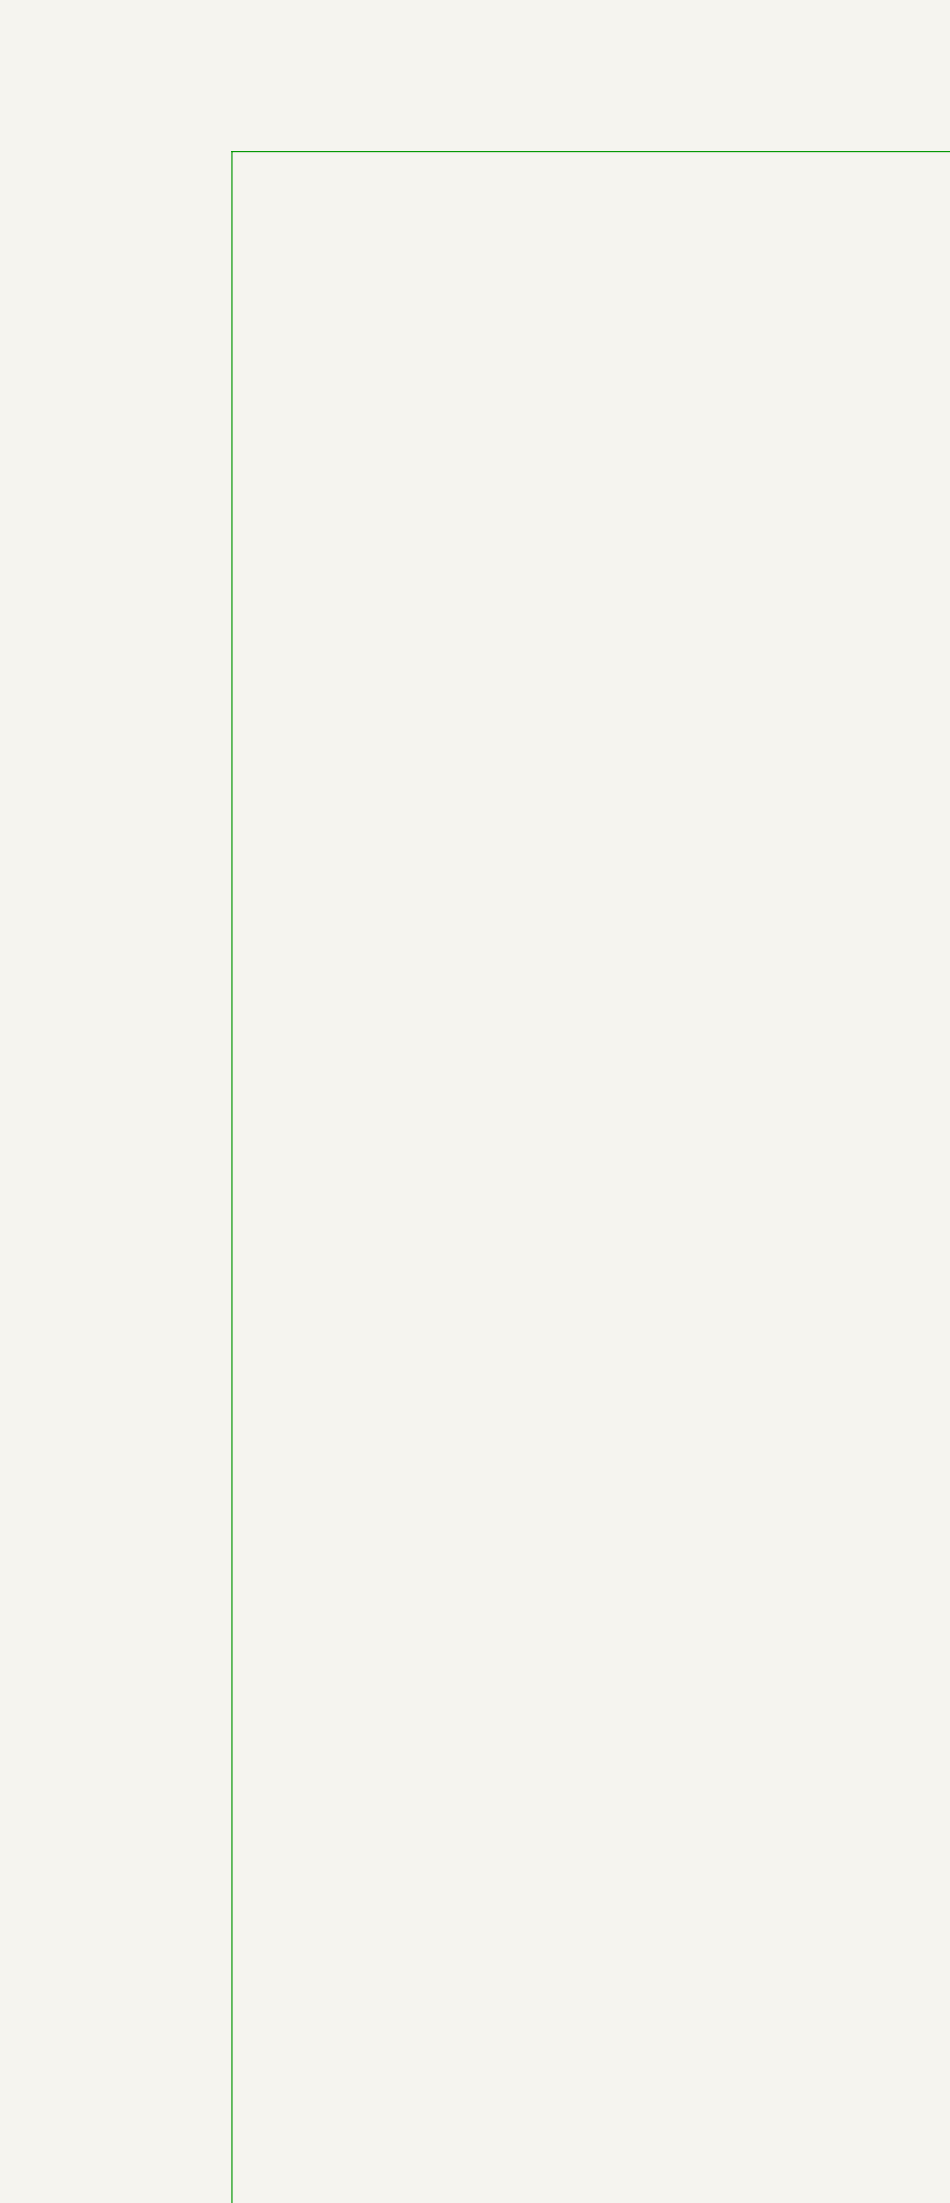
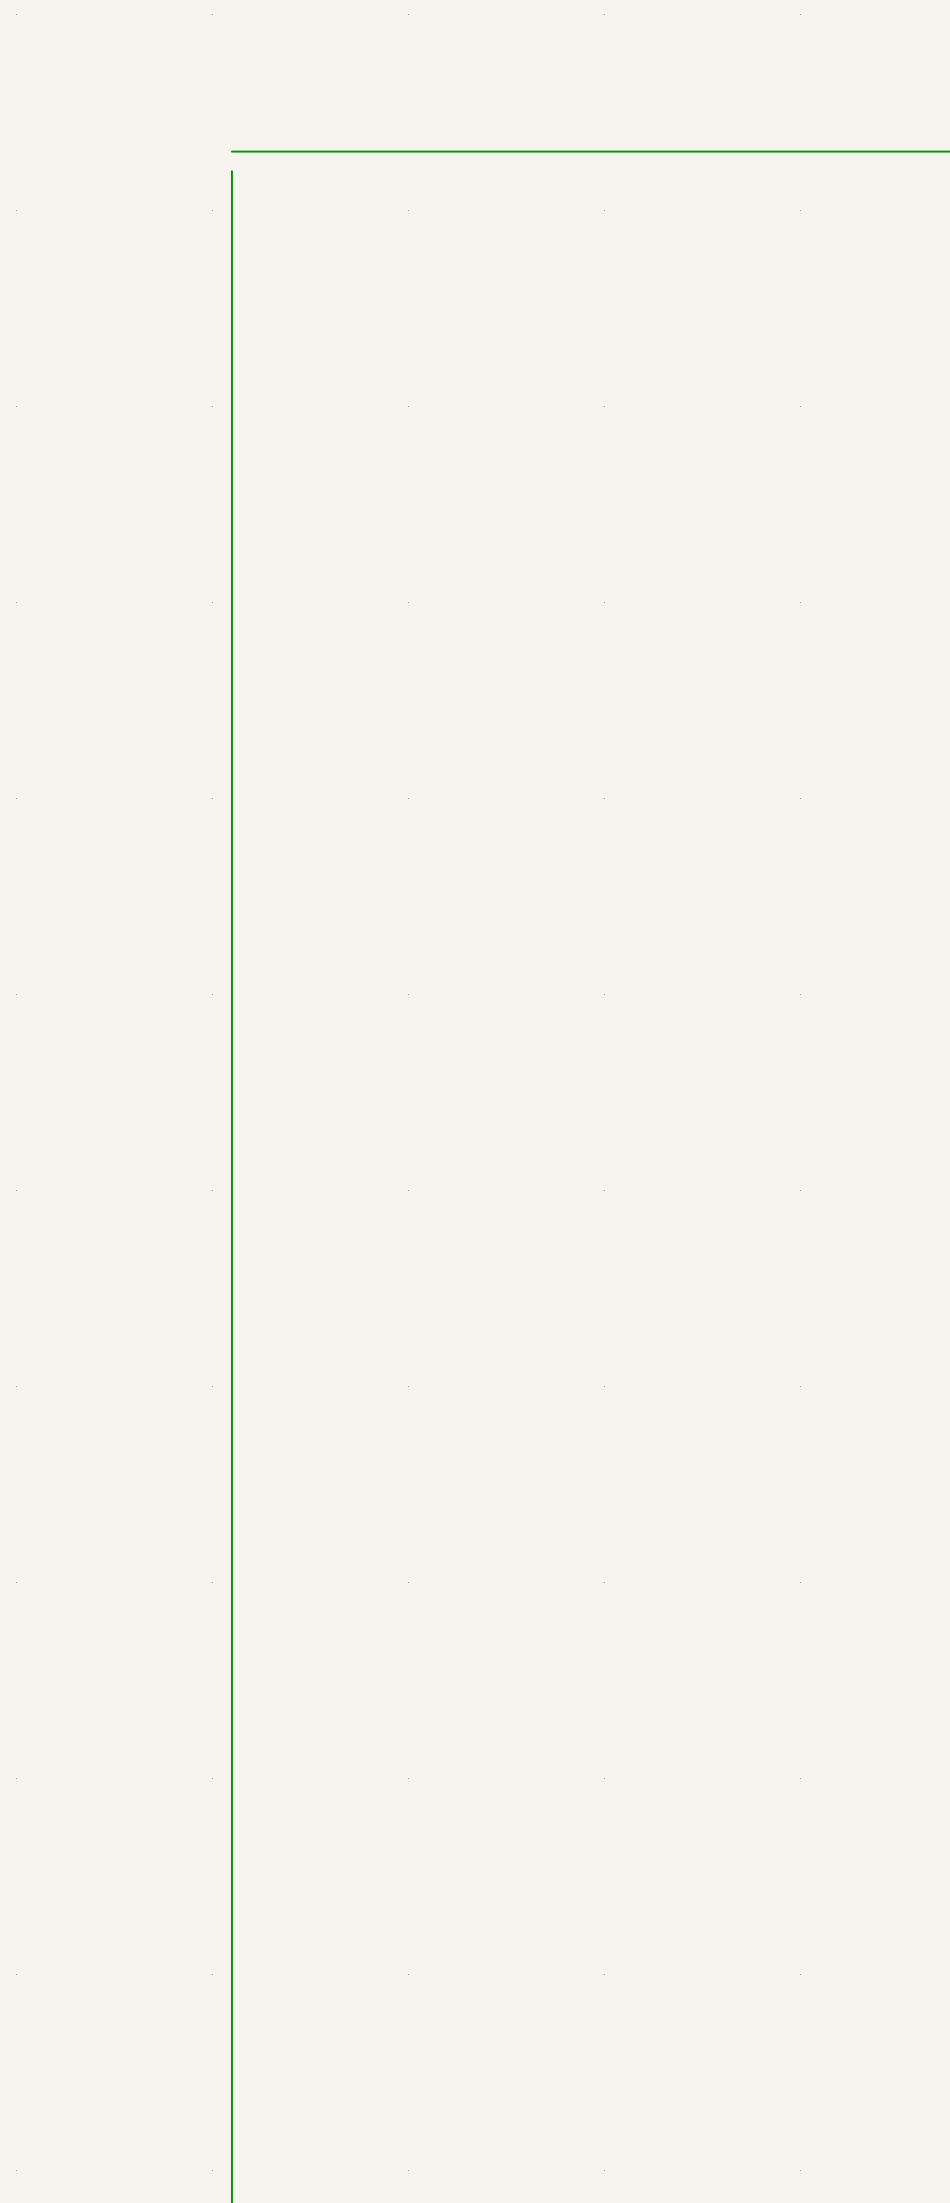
wire: (231, 151) (231, 171) -> none

